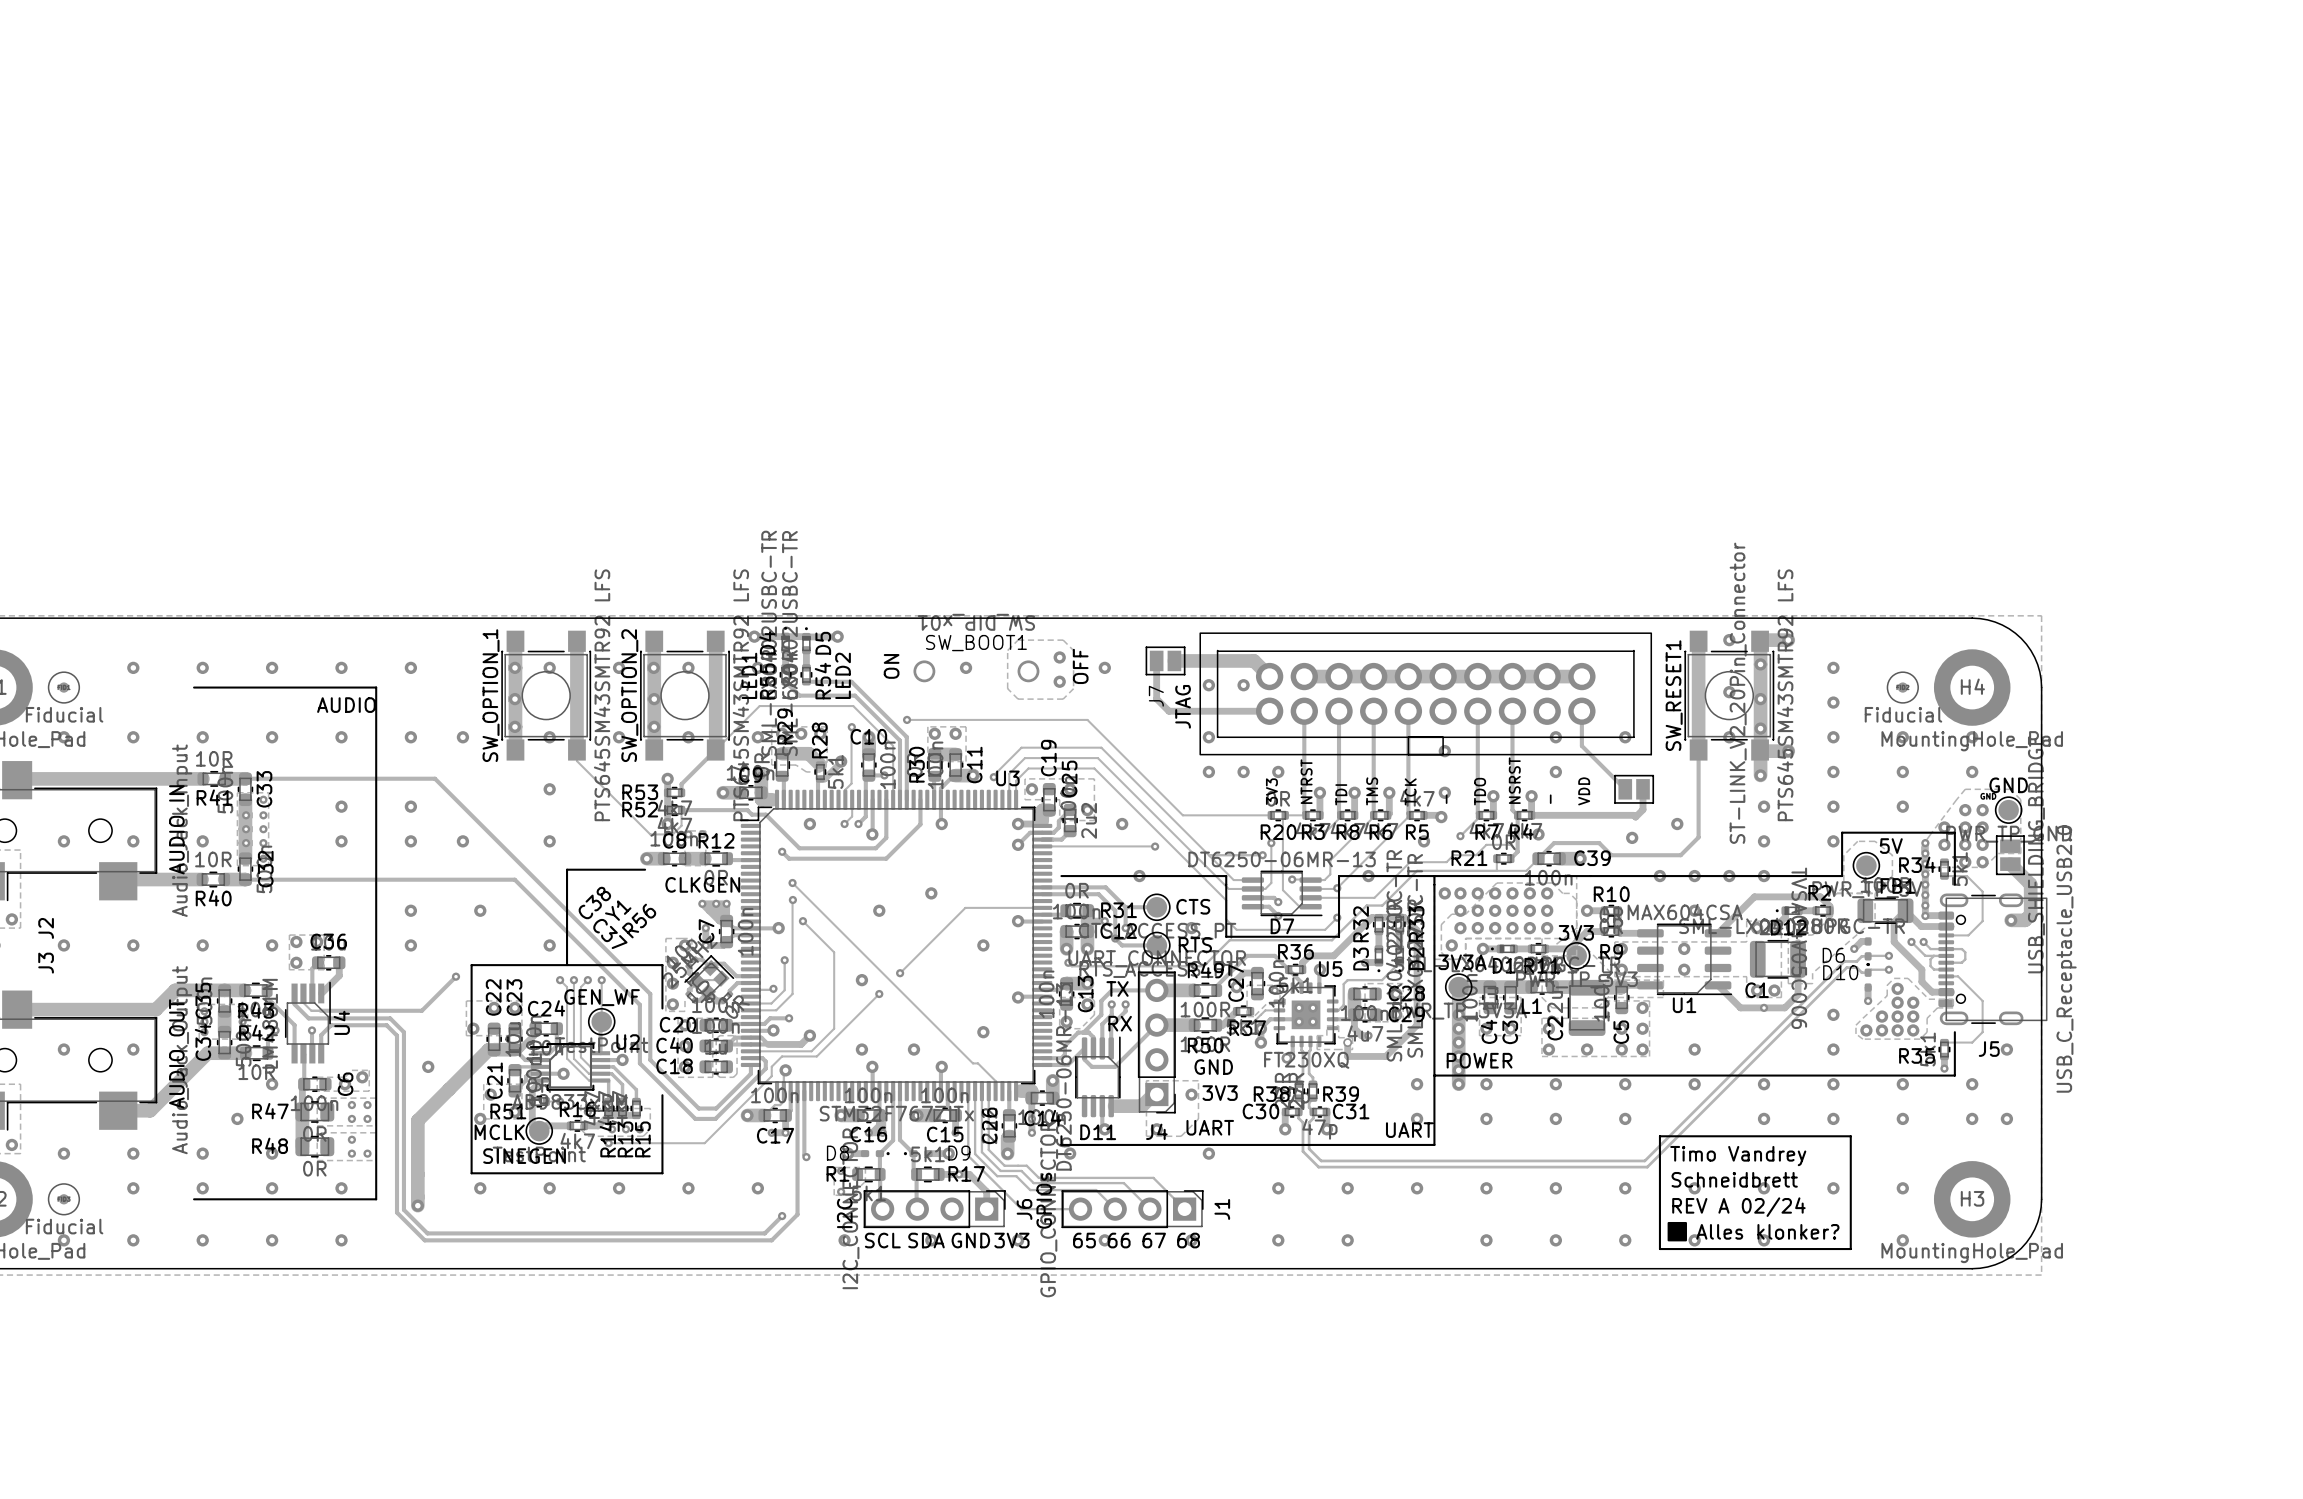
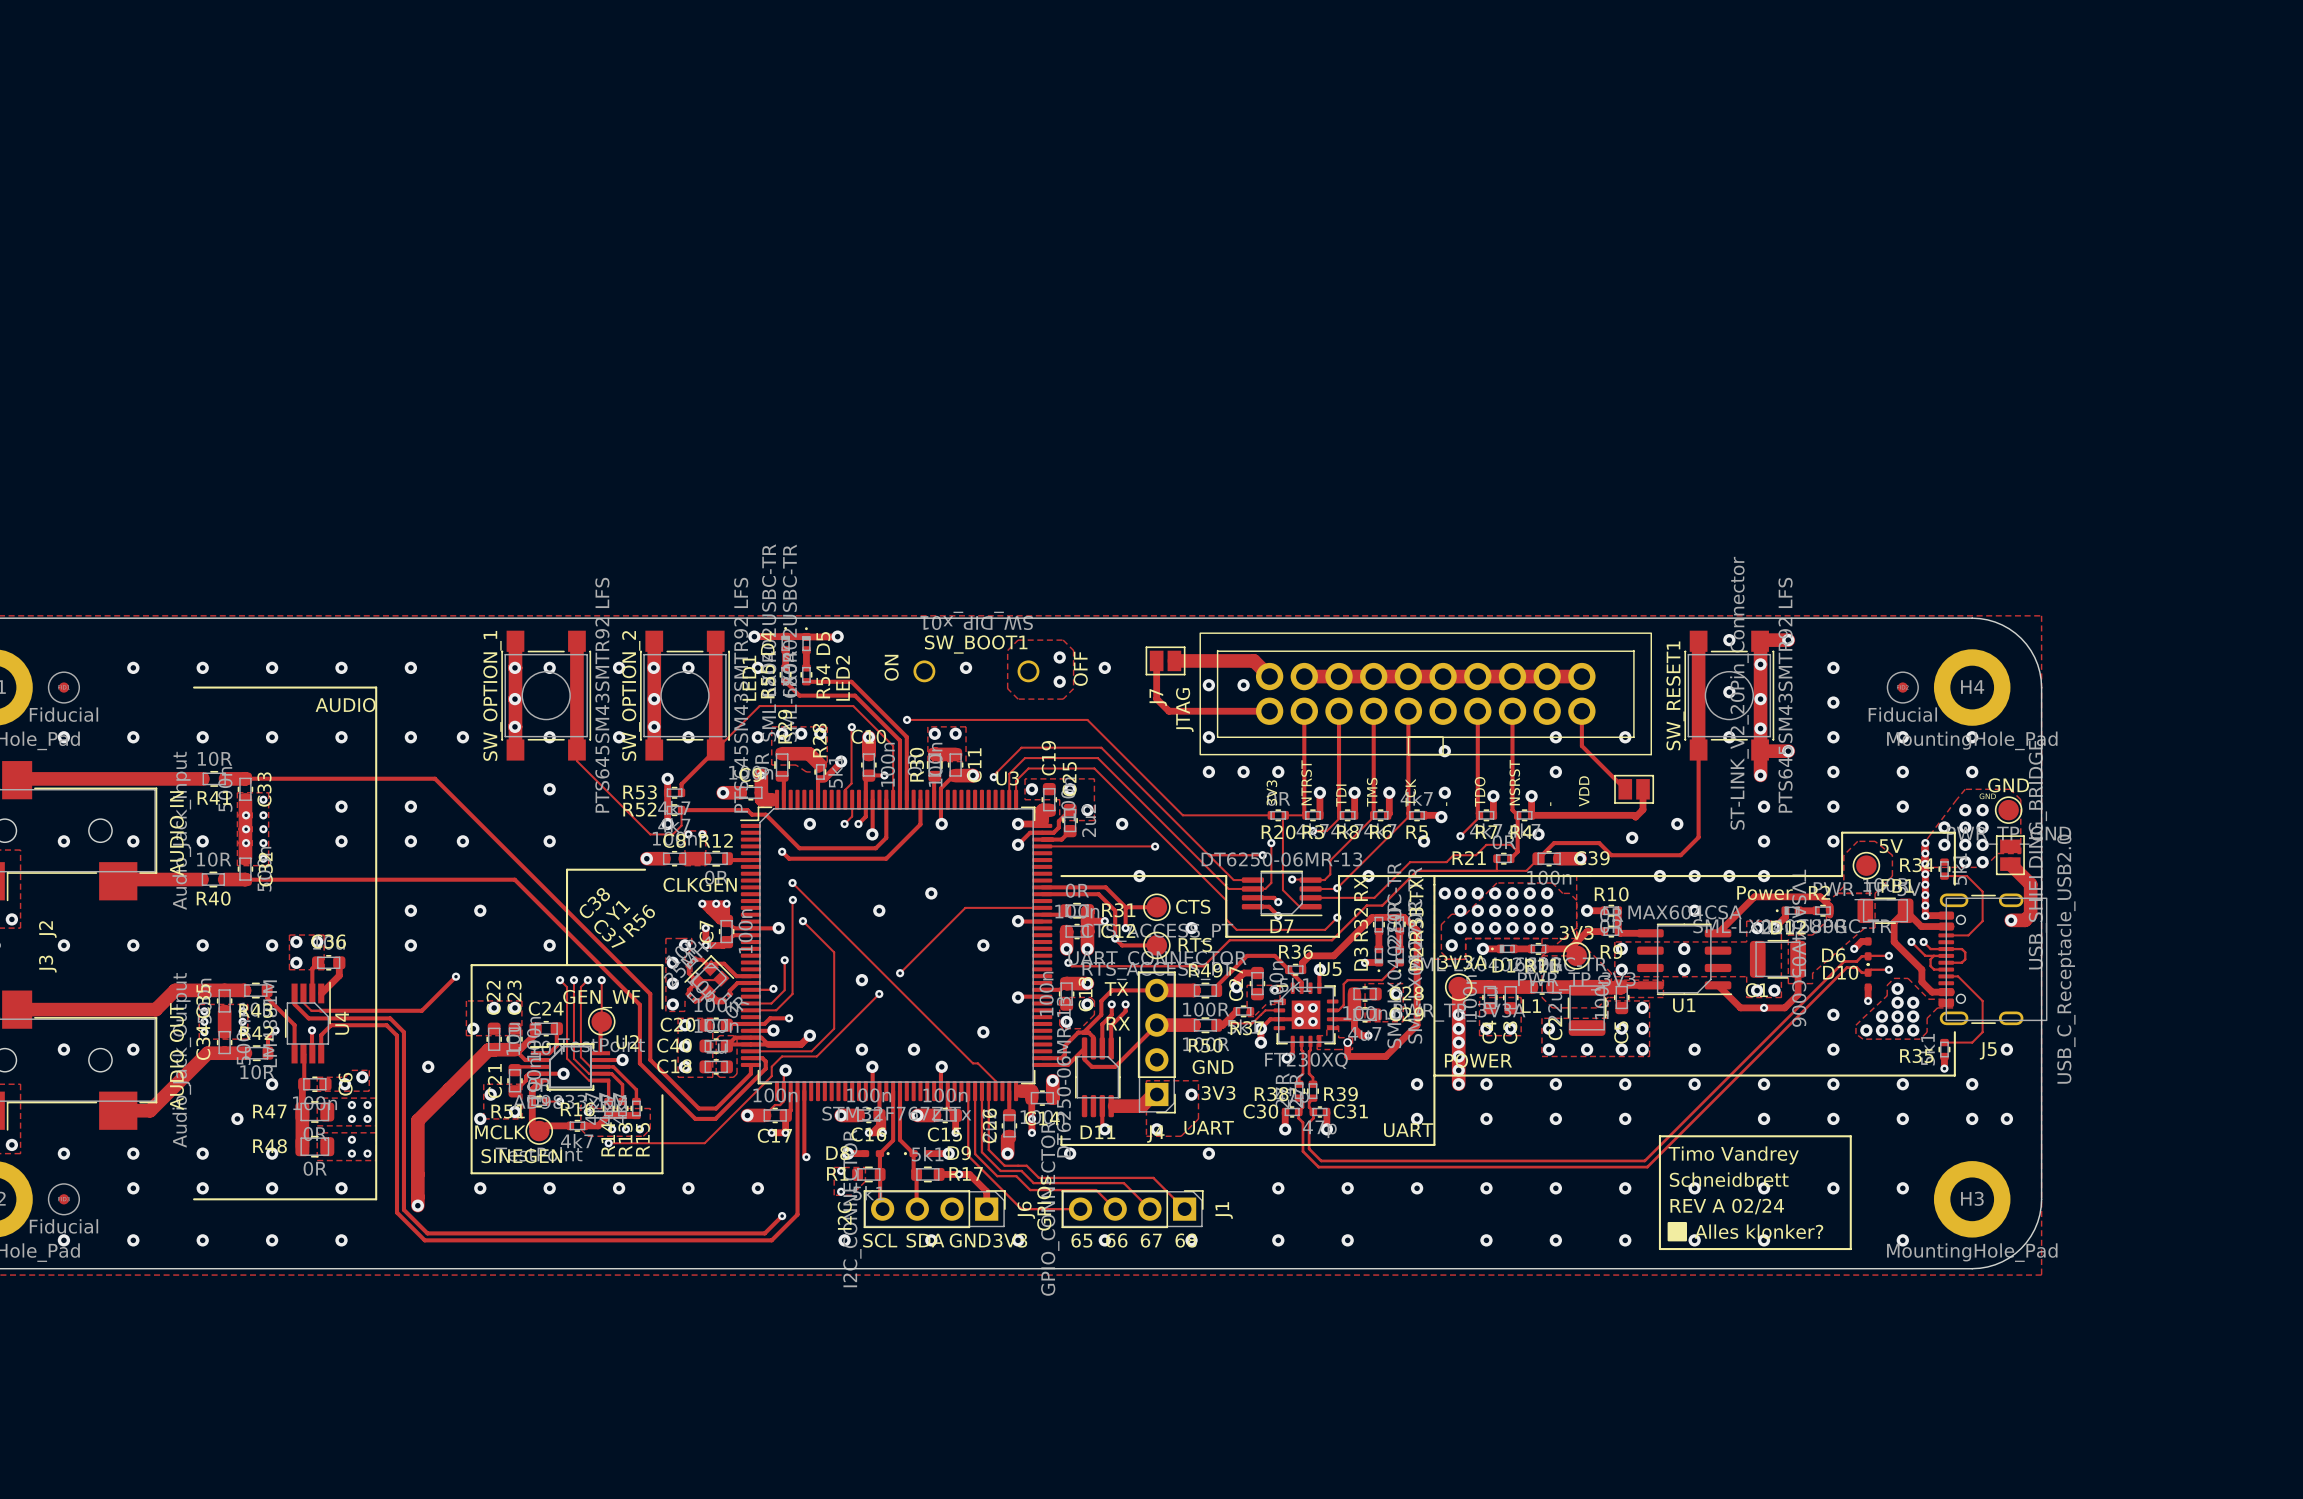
text: none -> RX (1361, 889)
text: none -> TX (1416, 890)
text: none -> Power (1764, 893)

